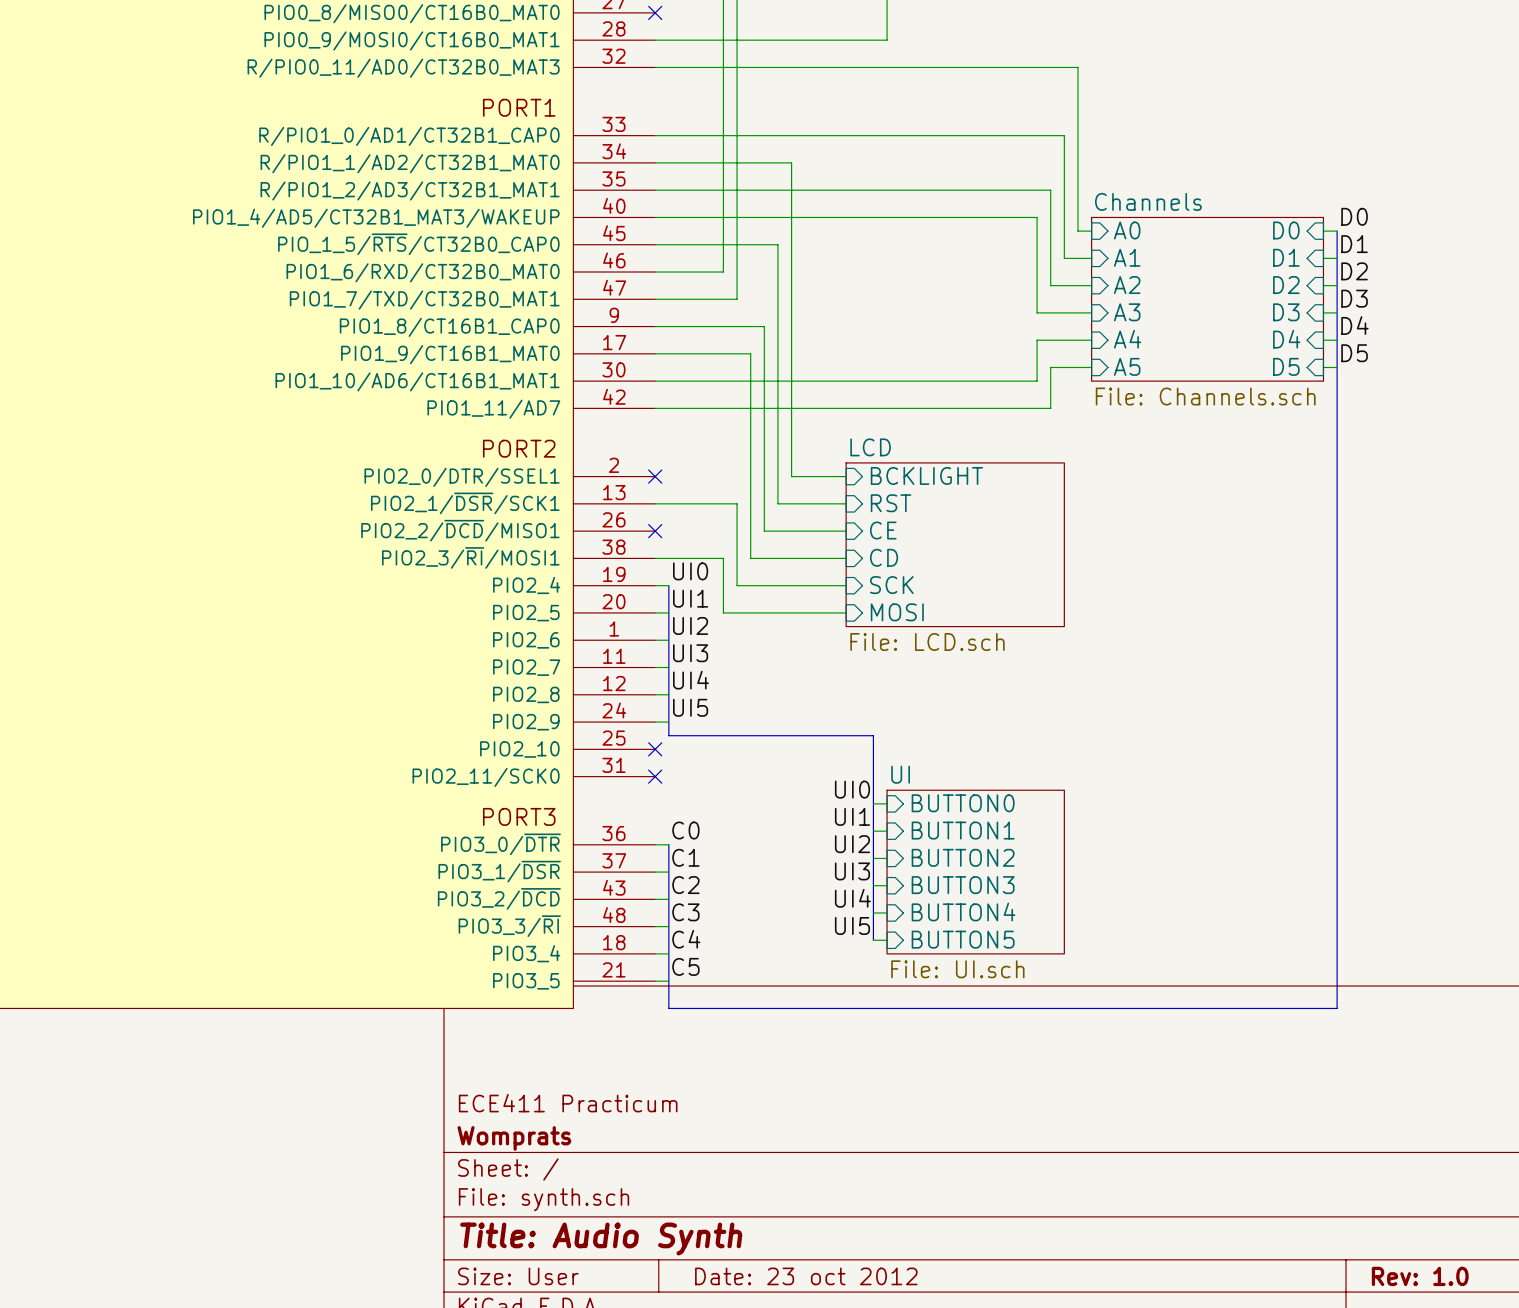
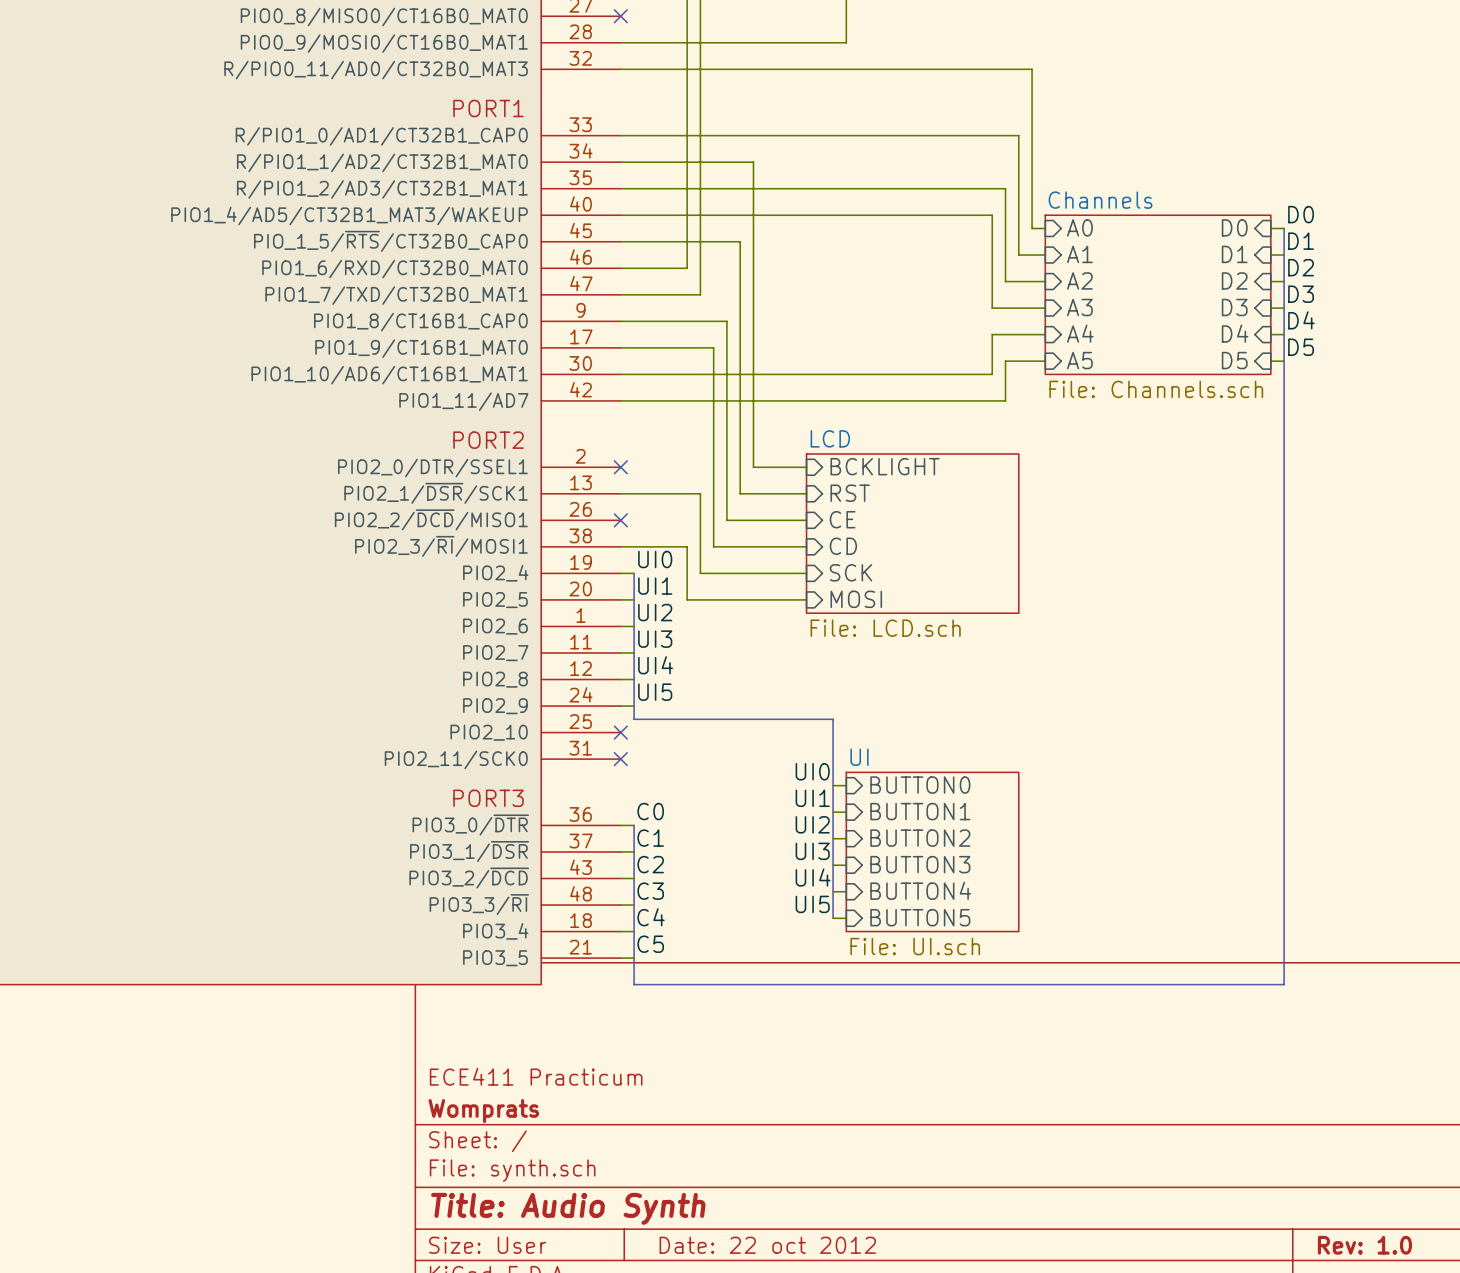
title block: Date: 23 oct 2012 (806, 1276) -> Date: 22 oct 2012 (767, 1245)

